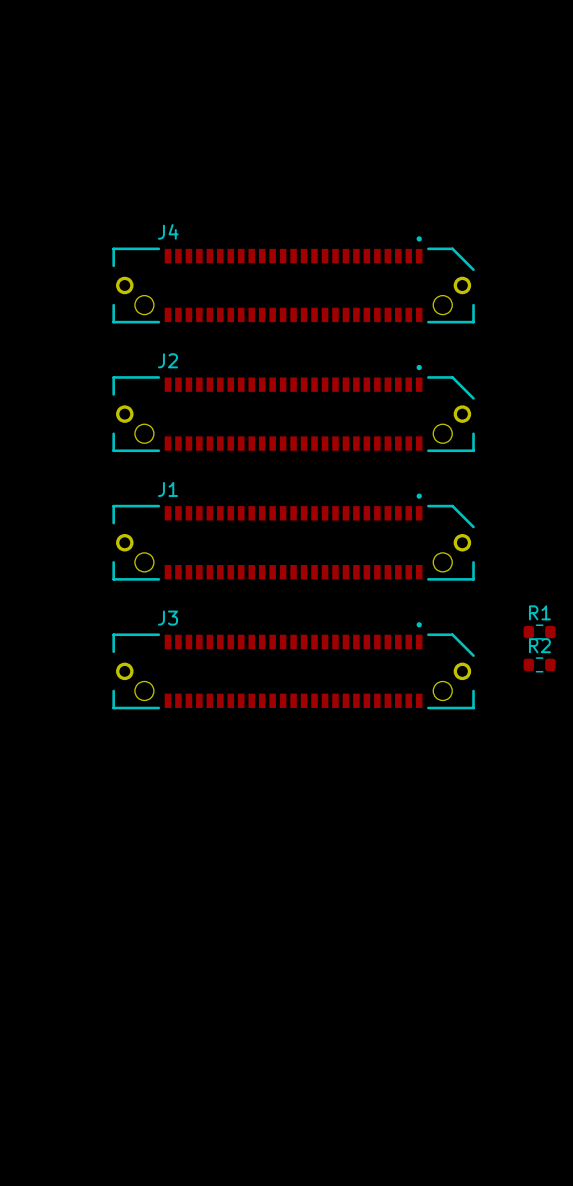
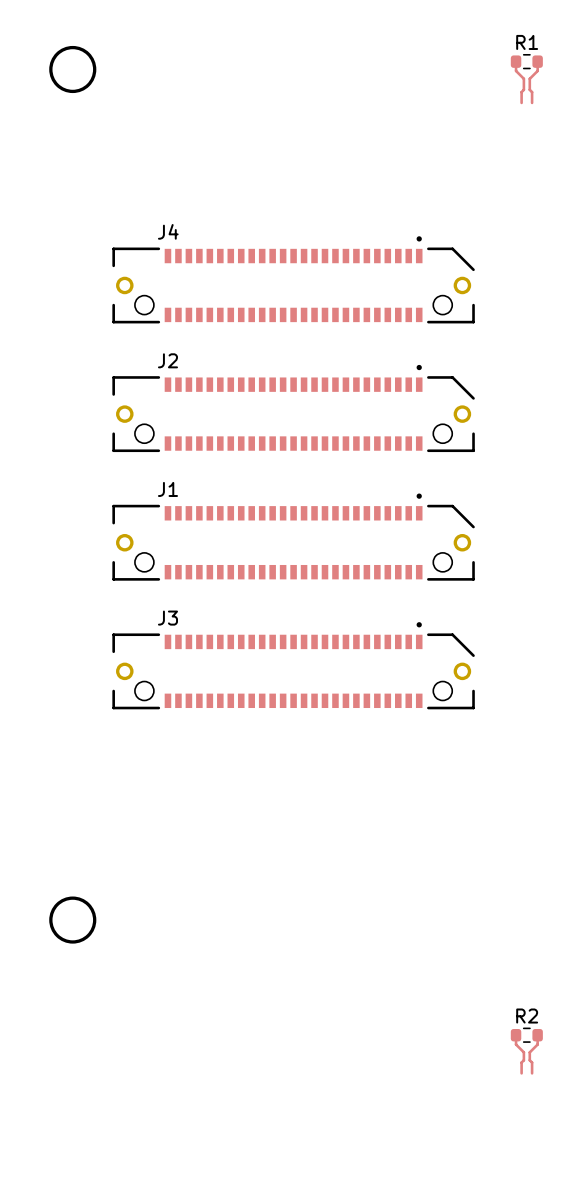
round board edge: none -> [49, 45, 97, 94]
track: none -> (516, 61) (516, 70) (523, 78) (521, 102)
track: none -> (537, 61) (537, 70) (529, 78) (532, 102)
R1 position: (539, 632) -> (526, 61)
R2 position: (539, 664) -> (526, 1035)
round board edge: none -> [49, 896, 97, 944]
track: none -> (516, 1035) (516, 1044) (523, 1052) (521, 1073)
track: none -> (537, 1035) (537, 1044) (529, 1052) (532, 1073)

